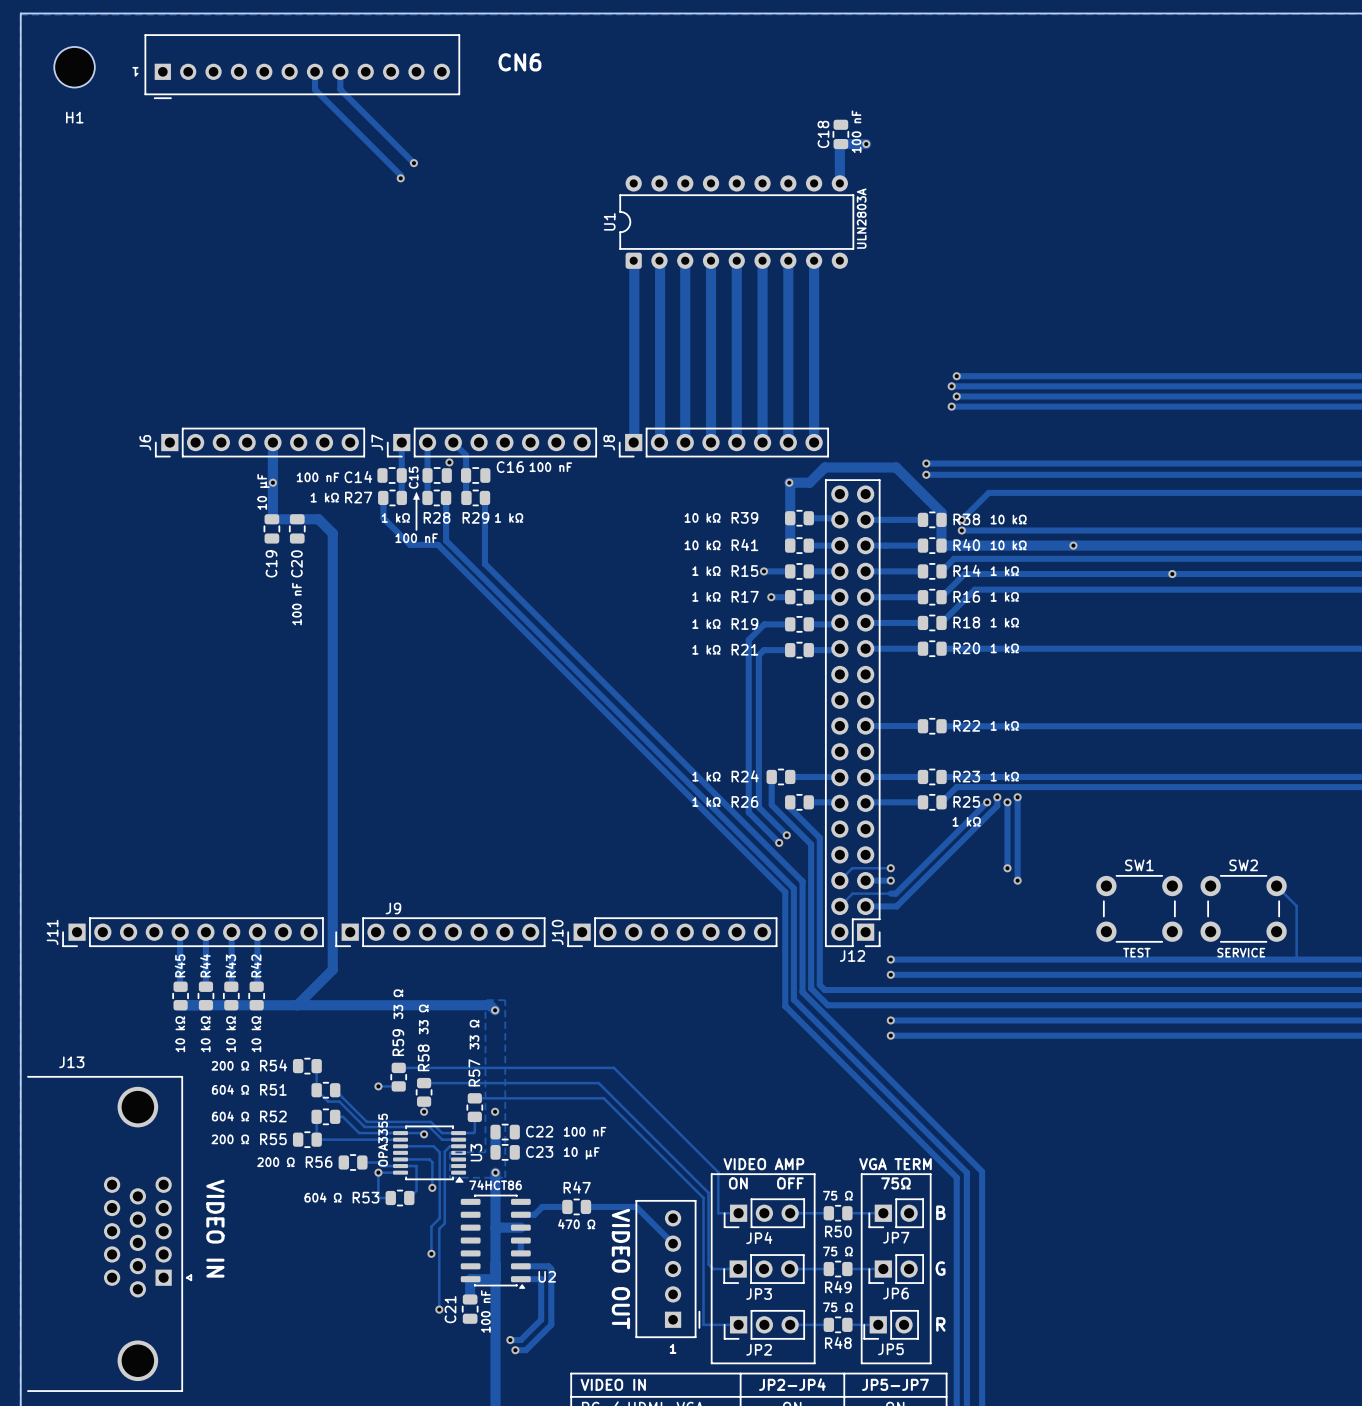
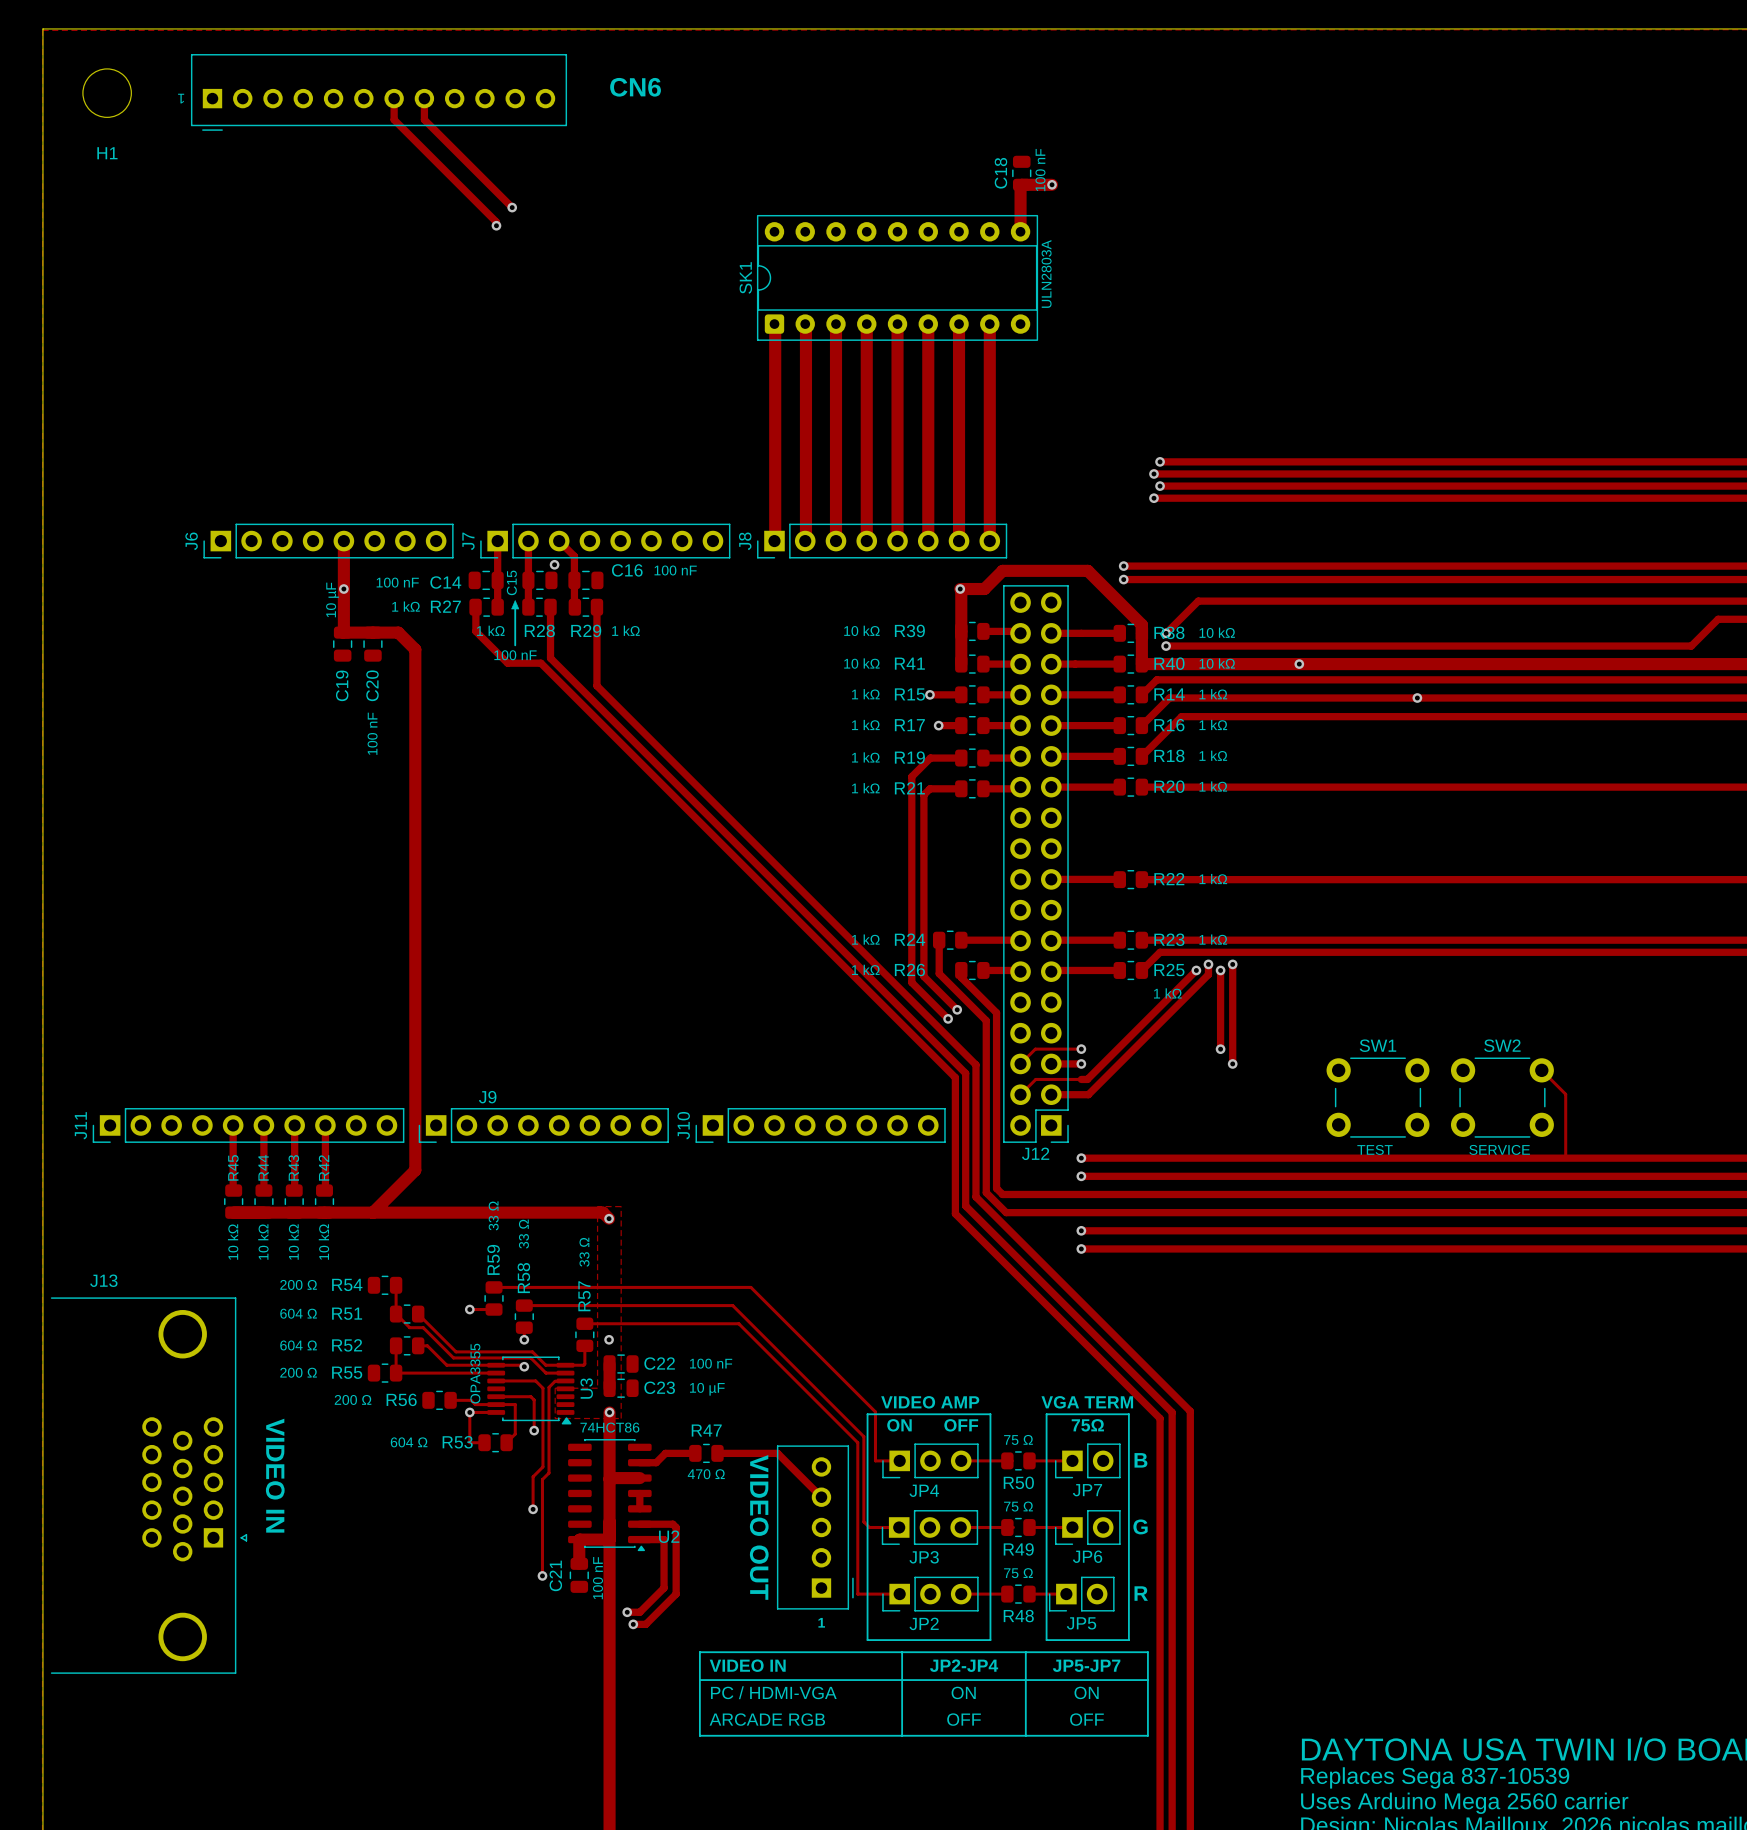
U1: (736, 222) -> none
SK1: none -> (897, 277)

